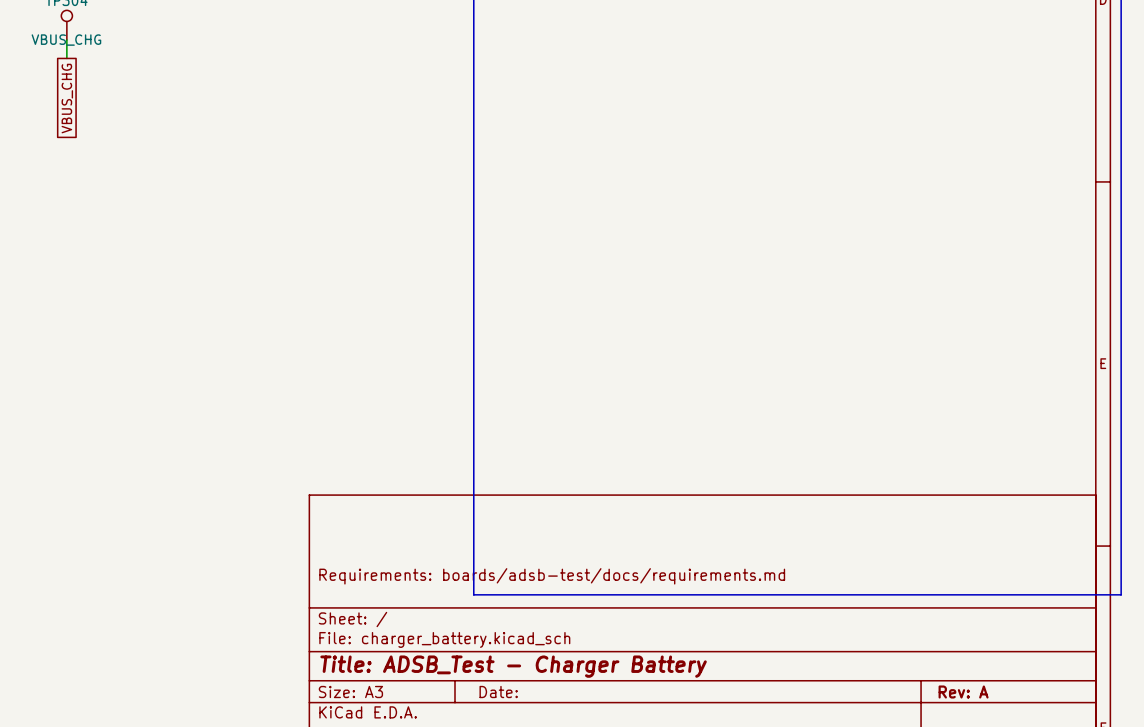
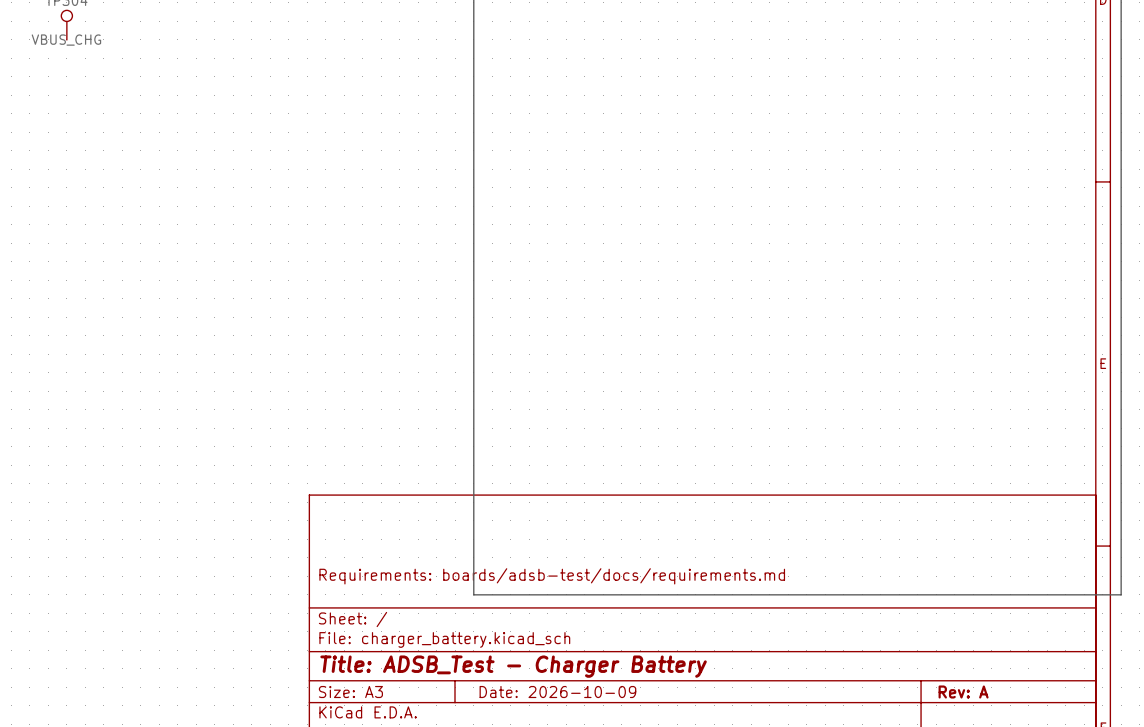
wire: (66, 39) (66, 58) -> none
global label: VBUS_CHG (67, 98) -> none
title block: Date: (498, 692) -> Date: 2026-10-09 (557, 692)

